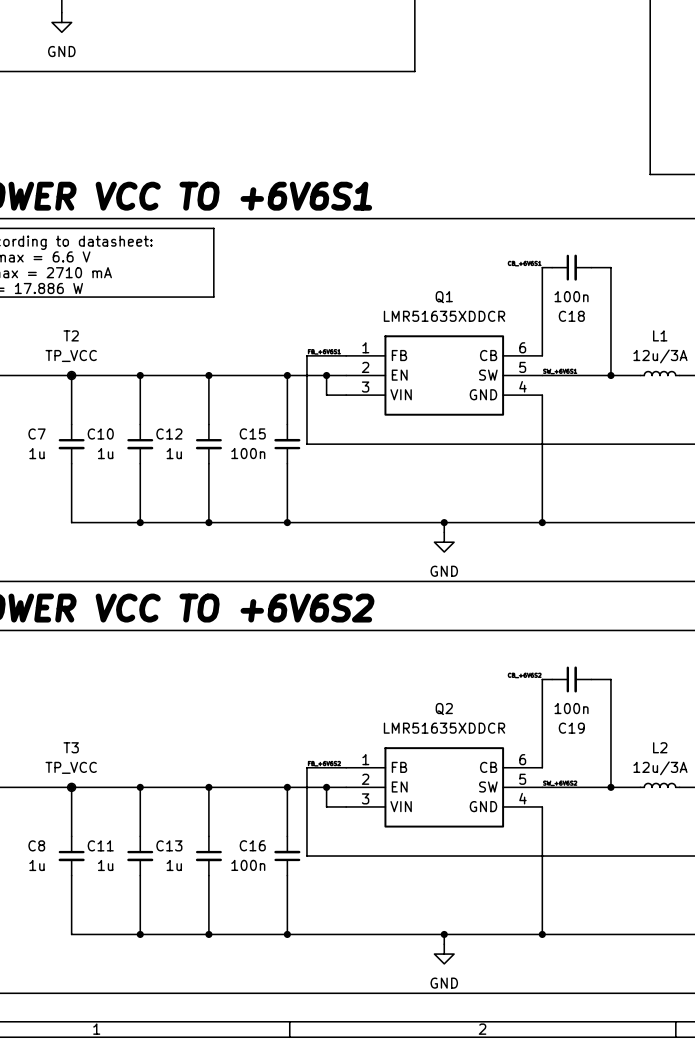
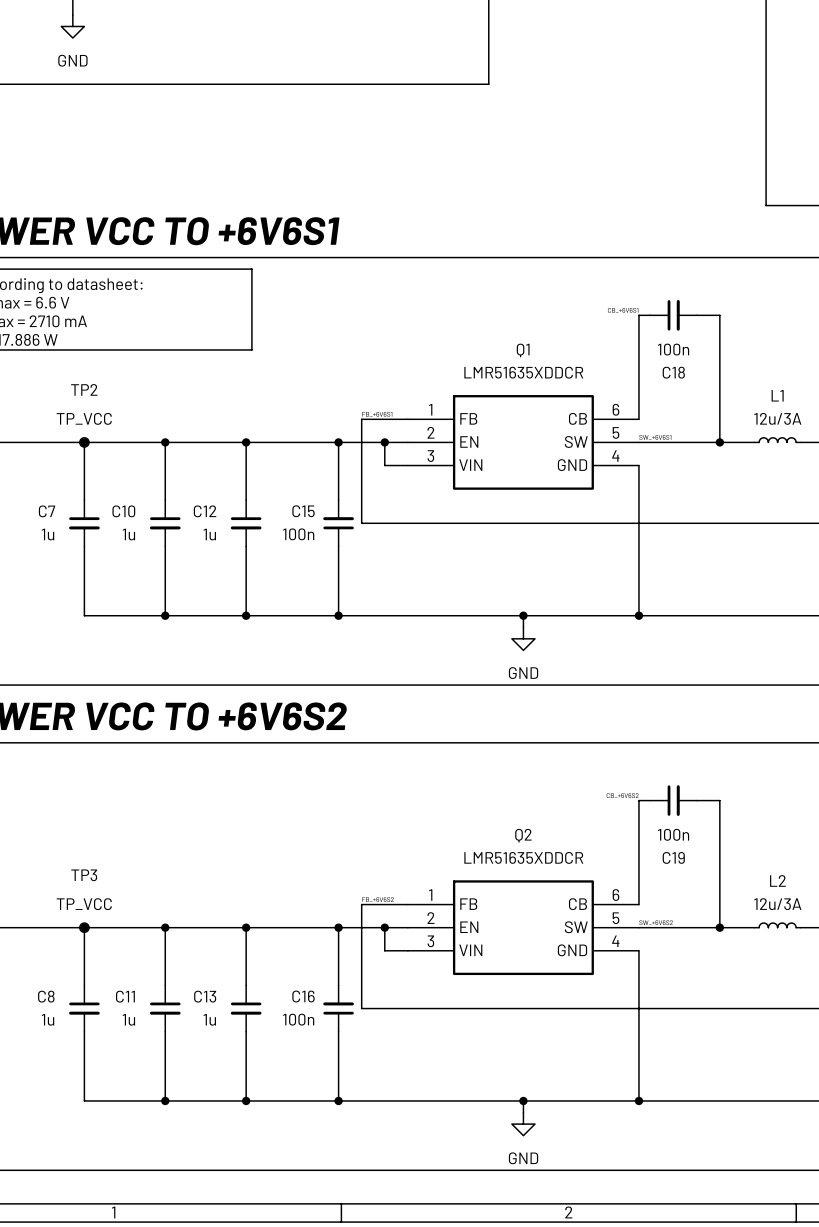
T2 name: T2 (71, 335) -> TP2 (84, 389)
T3 name: T3 (71, 747) -> TP3 (84, 875)

